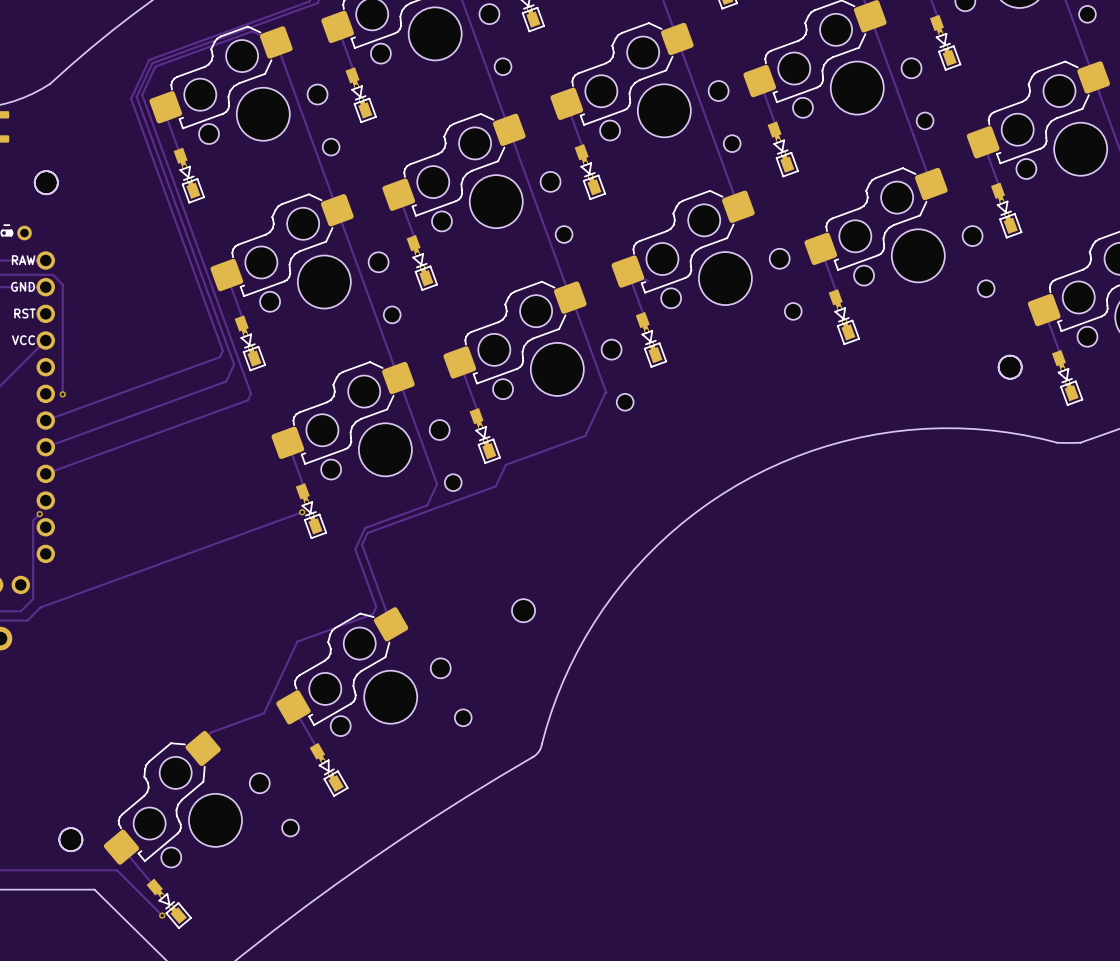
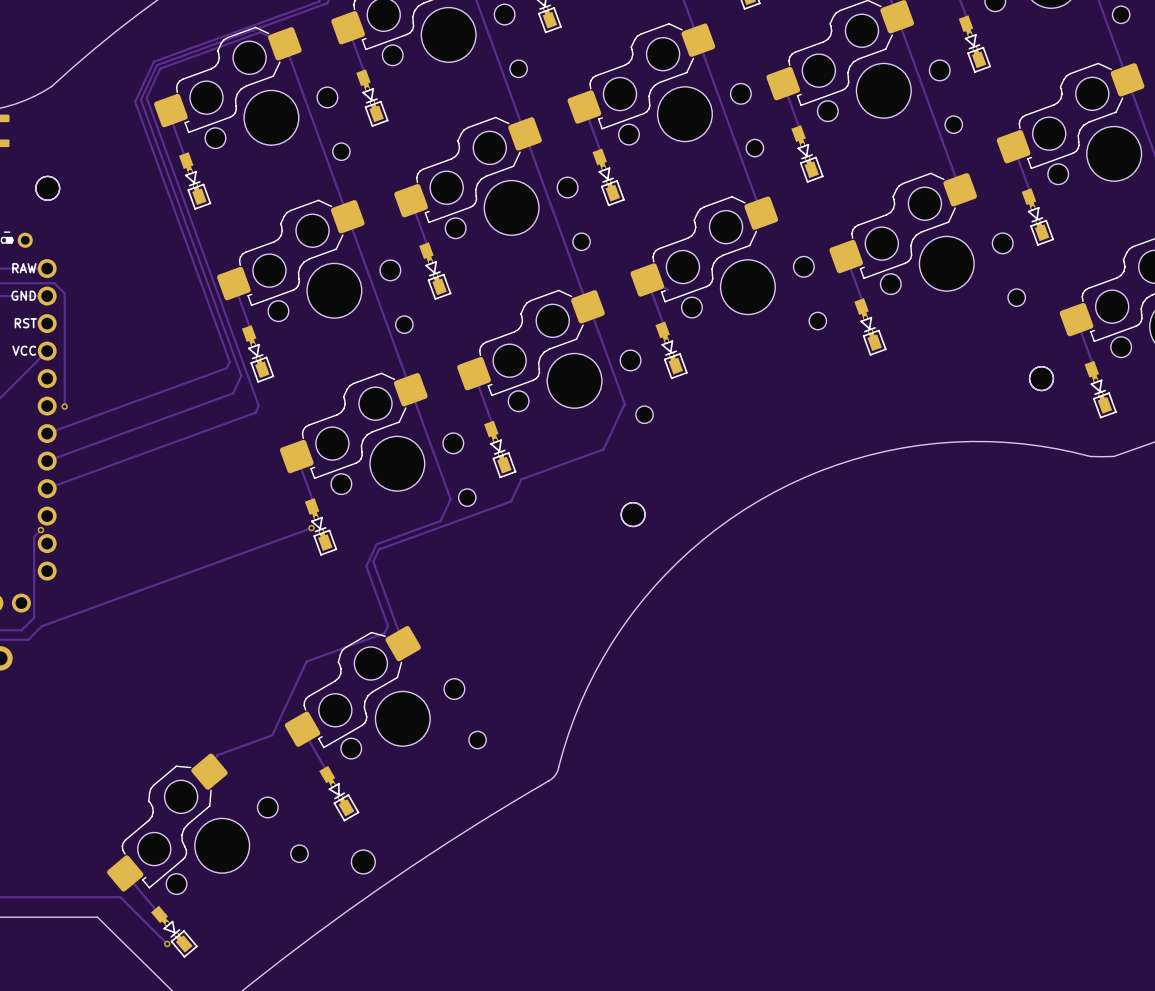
part: none -> (633, 514)
part: (523, 610) -> none
part: none -> (363, 861)
part: (70, 839) -> none

